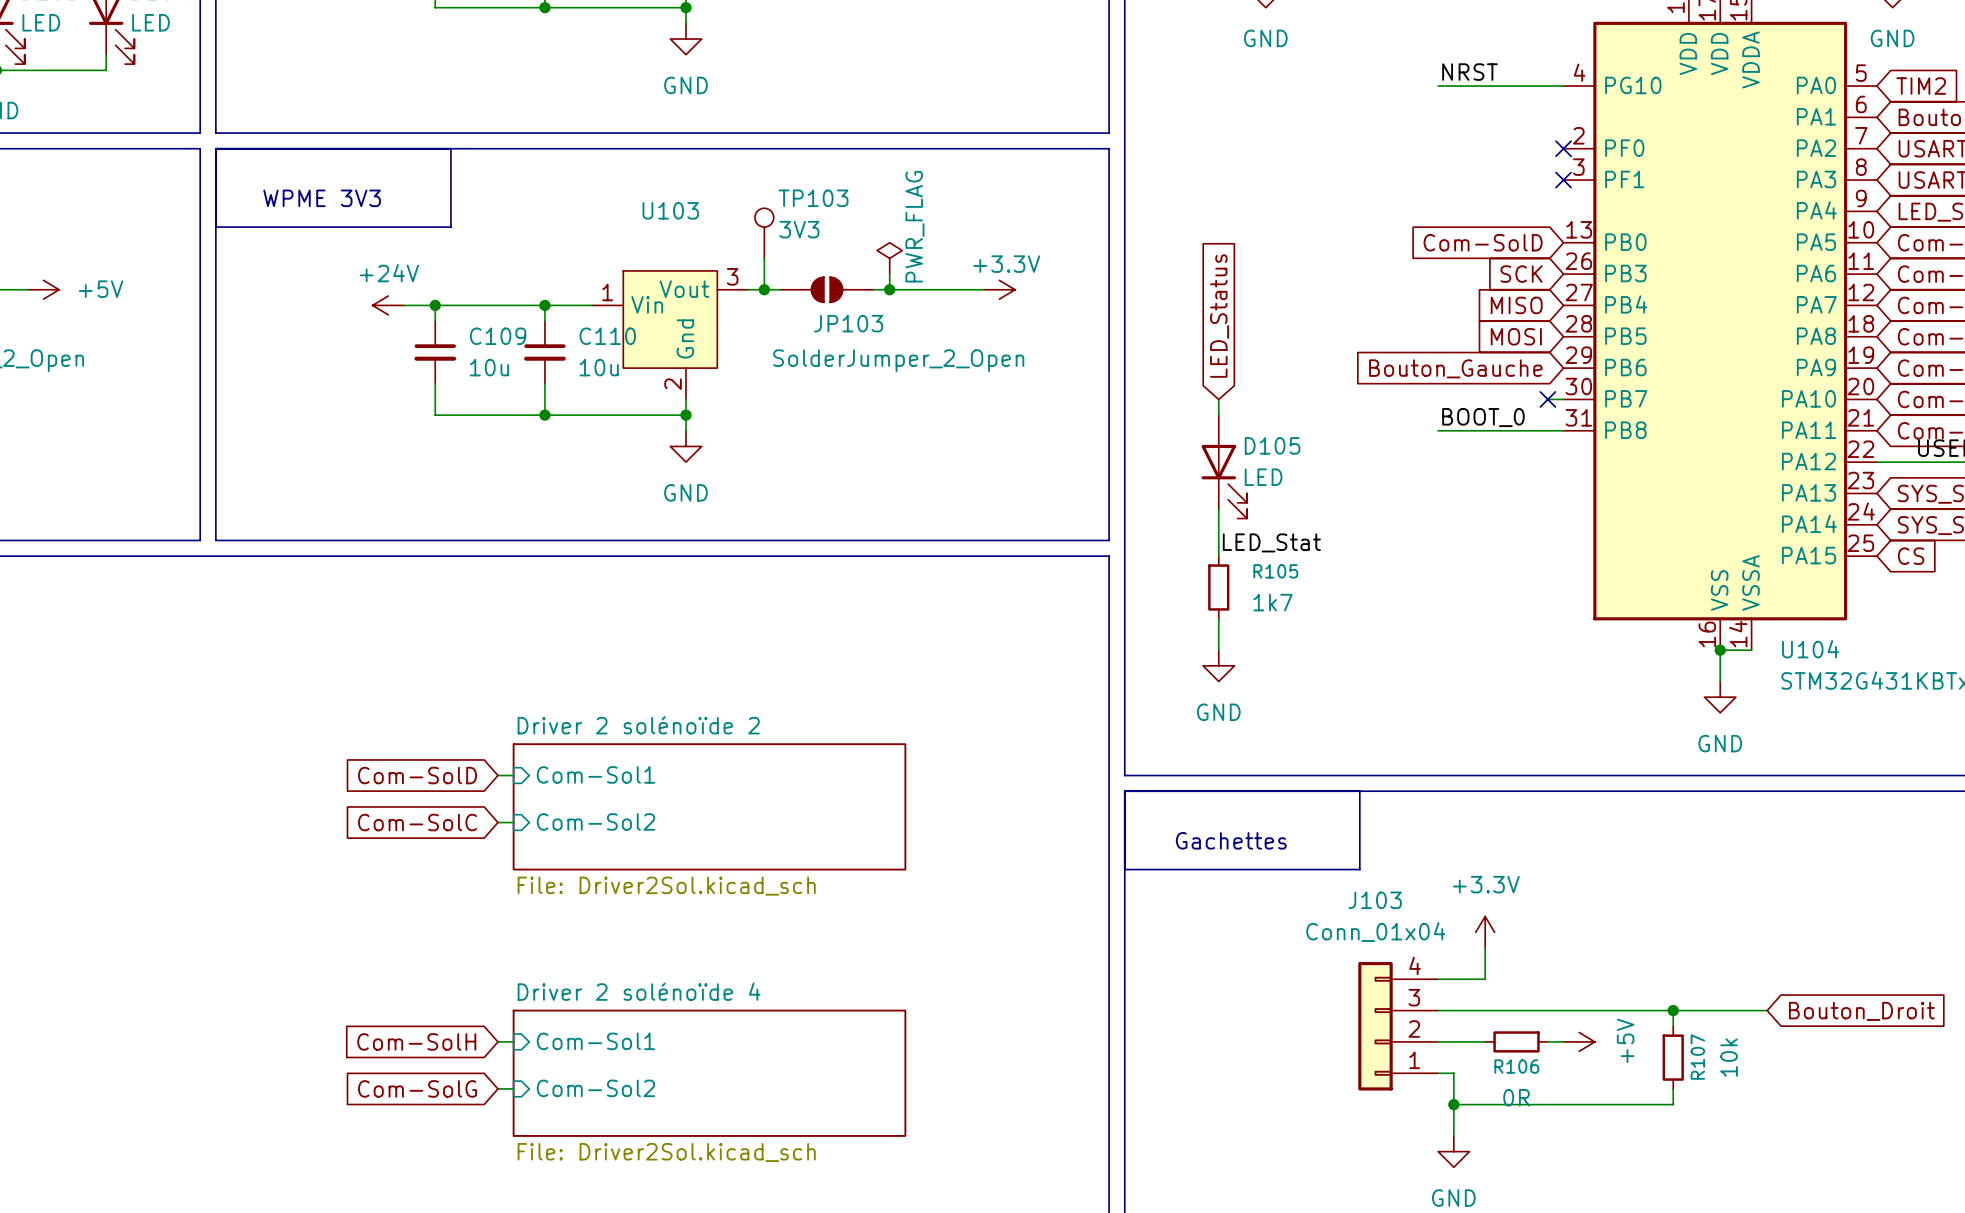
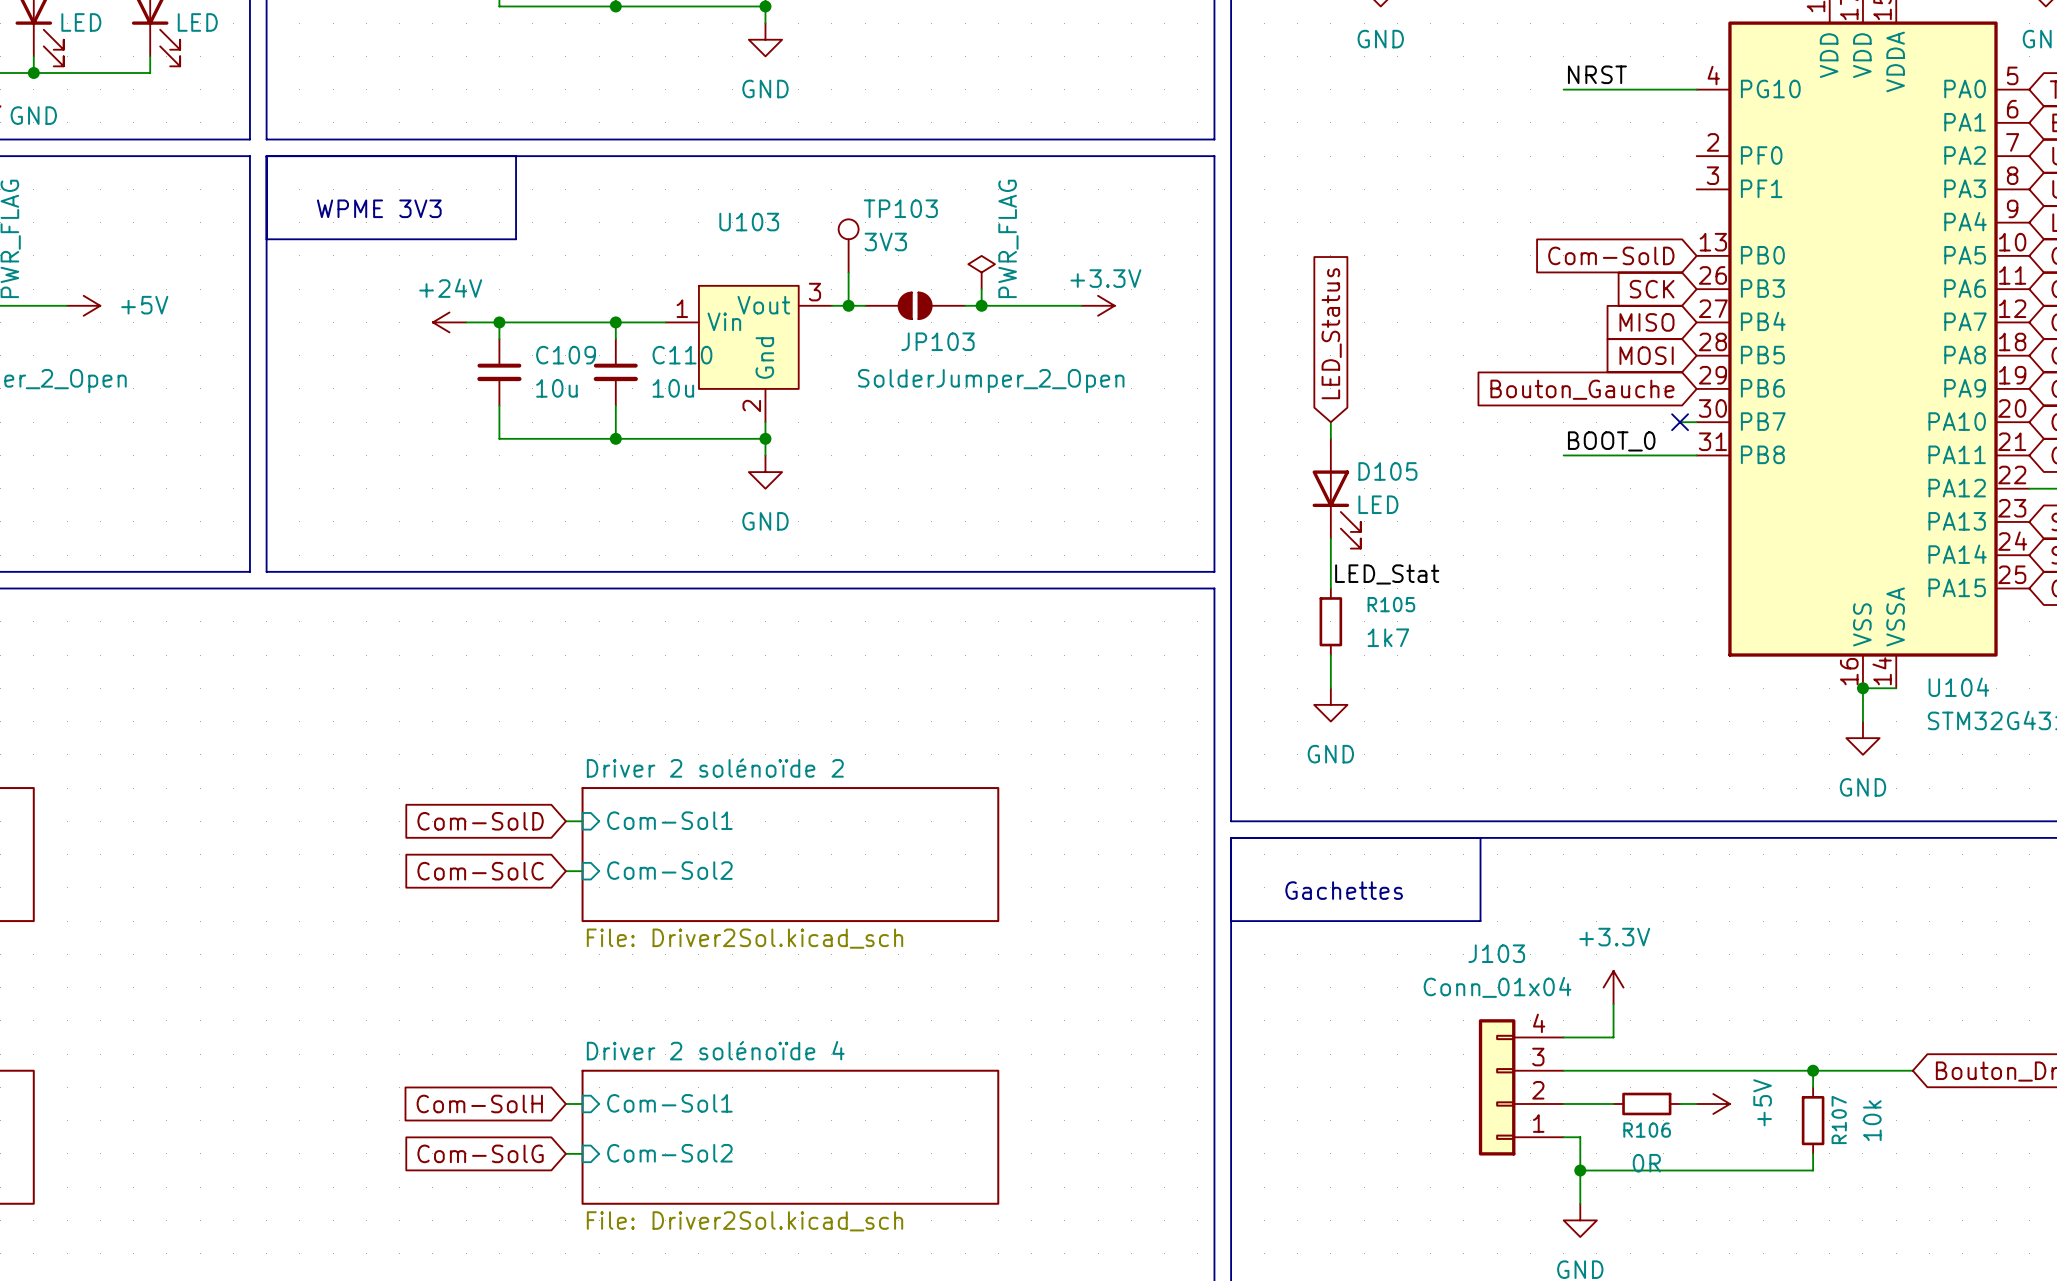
no-connect mark: (1563, 148) -> none
no-connect mark: (1563, 180) -> none

